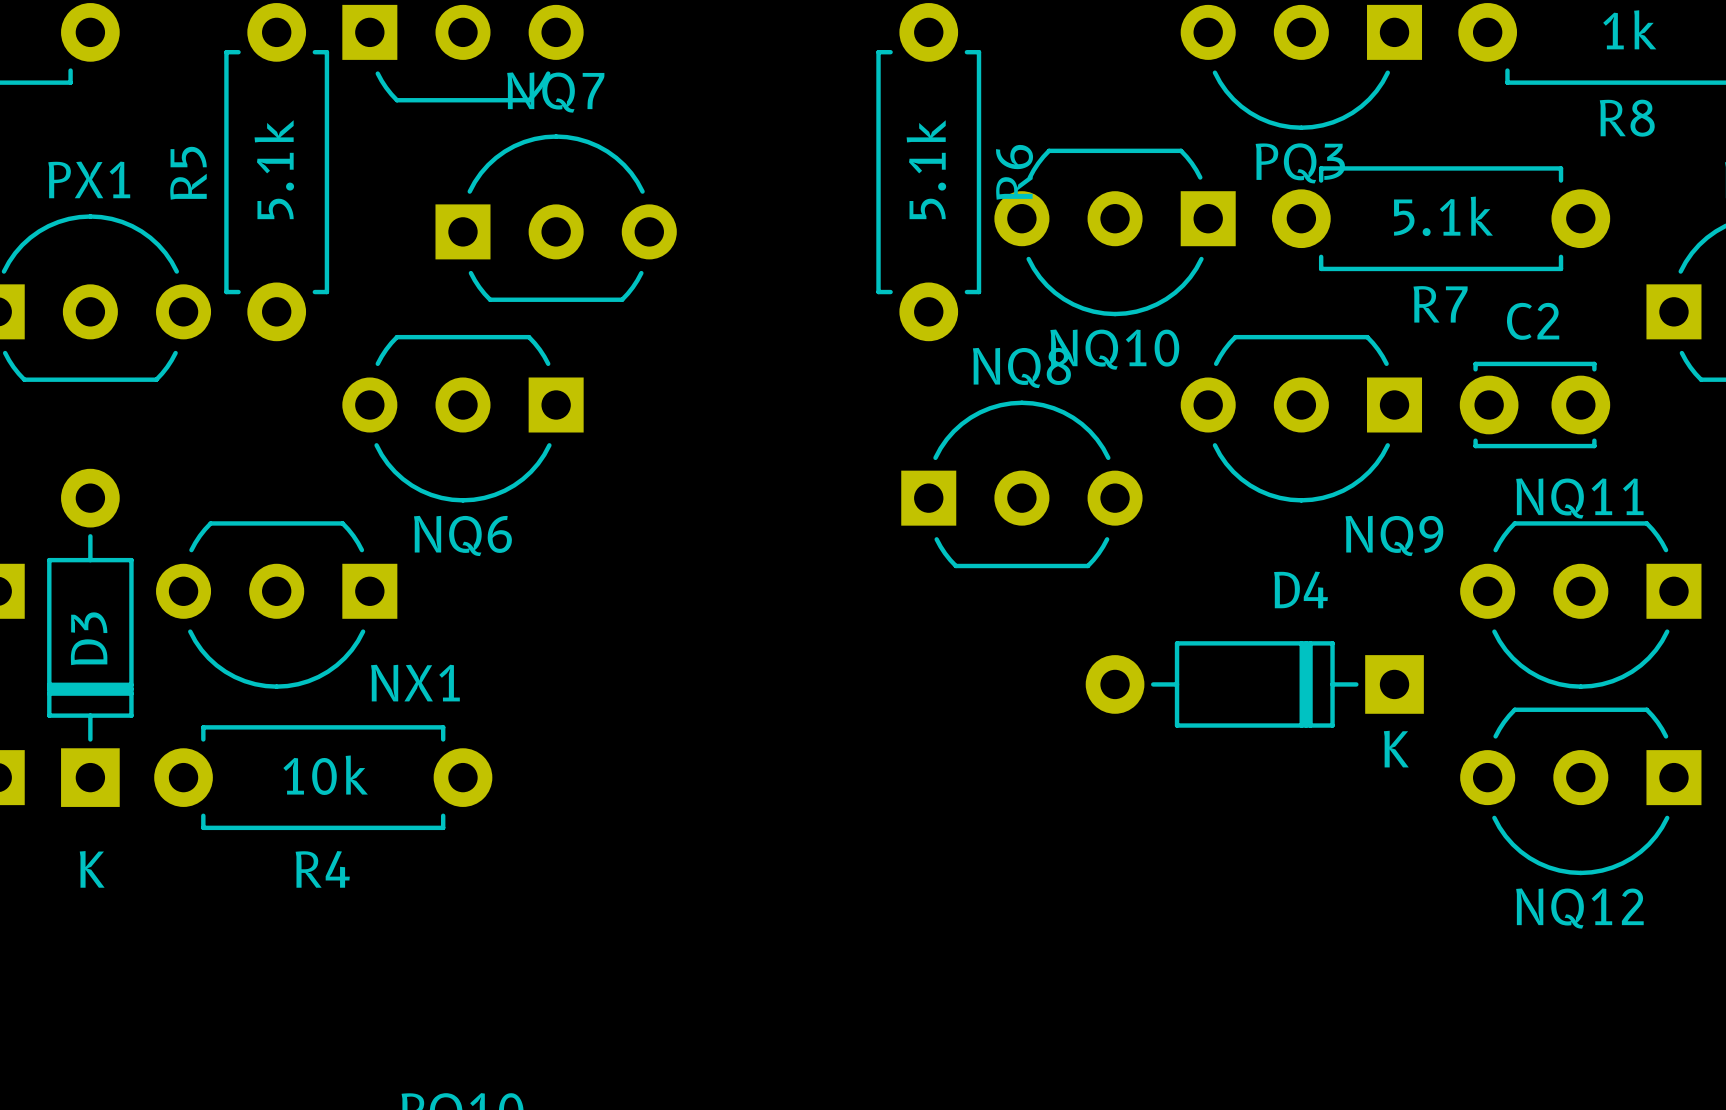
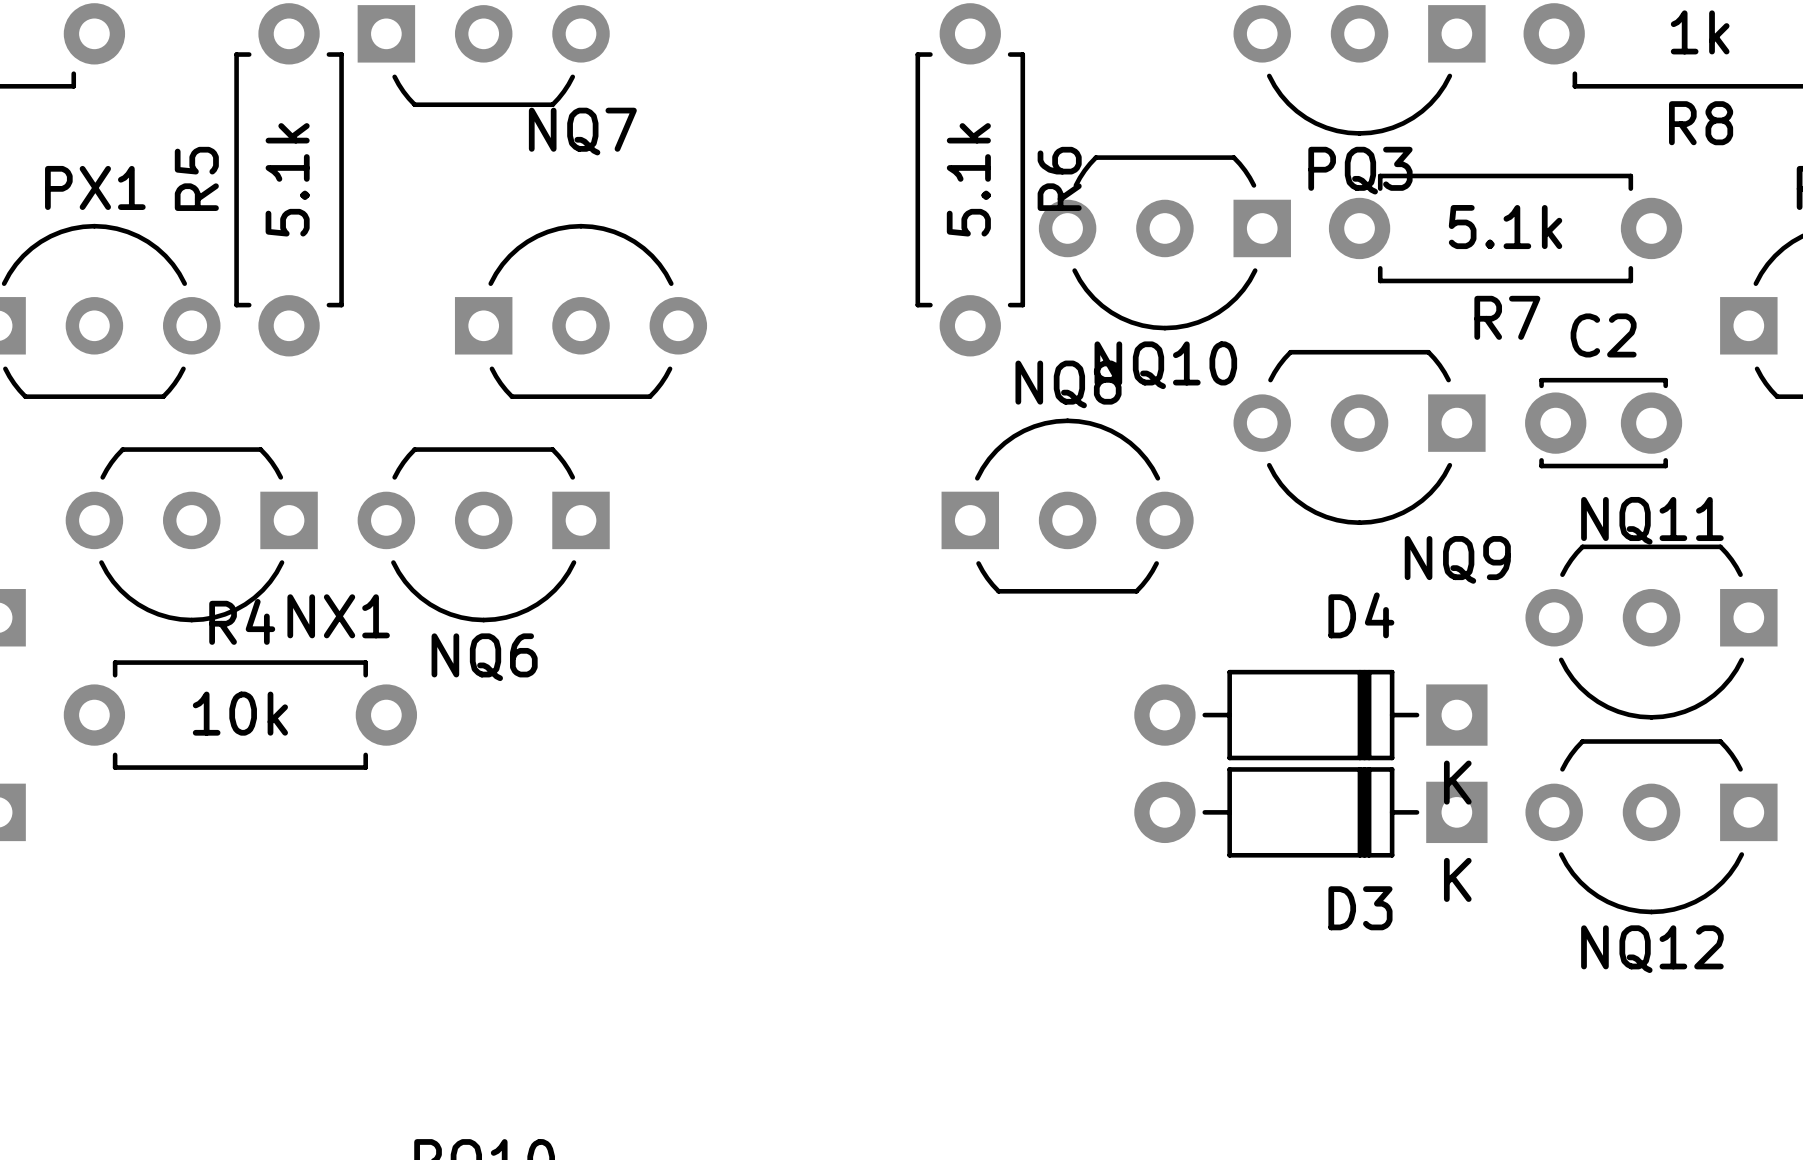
NQ7 name position: NQ7 (555, 92) -> NQ7 (582, 131)
NQ7 position: (556, 218) -> (581, 311)
NQ6 position: (462, 418) -> (483, 534)
D3 footprint: [47, 468, 134, 807] -> [1134, 767, 1488, 858]
NX1 position: (276, 605) -> (191, 534)
D3 name position: D3 (89, 638) -> D3 (1360, 908)
R4 position: (323, 777) -> (240, 715)
R4 name position: R4 (322, 869) -> R4 (242, 621)

